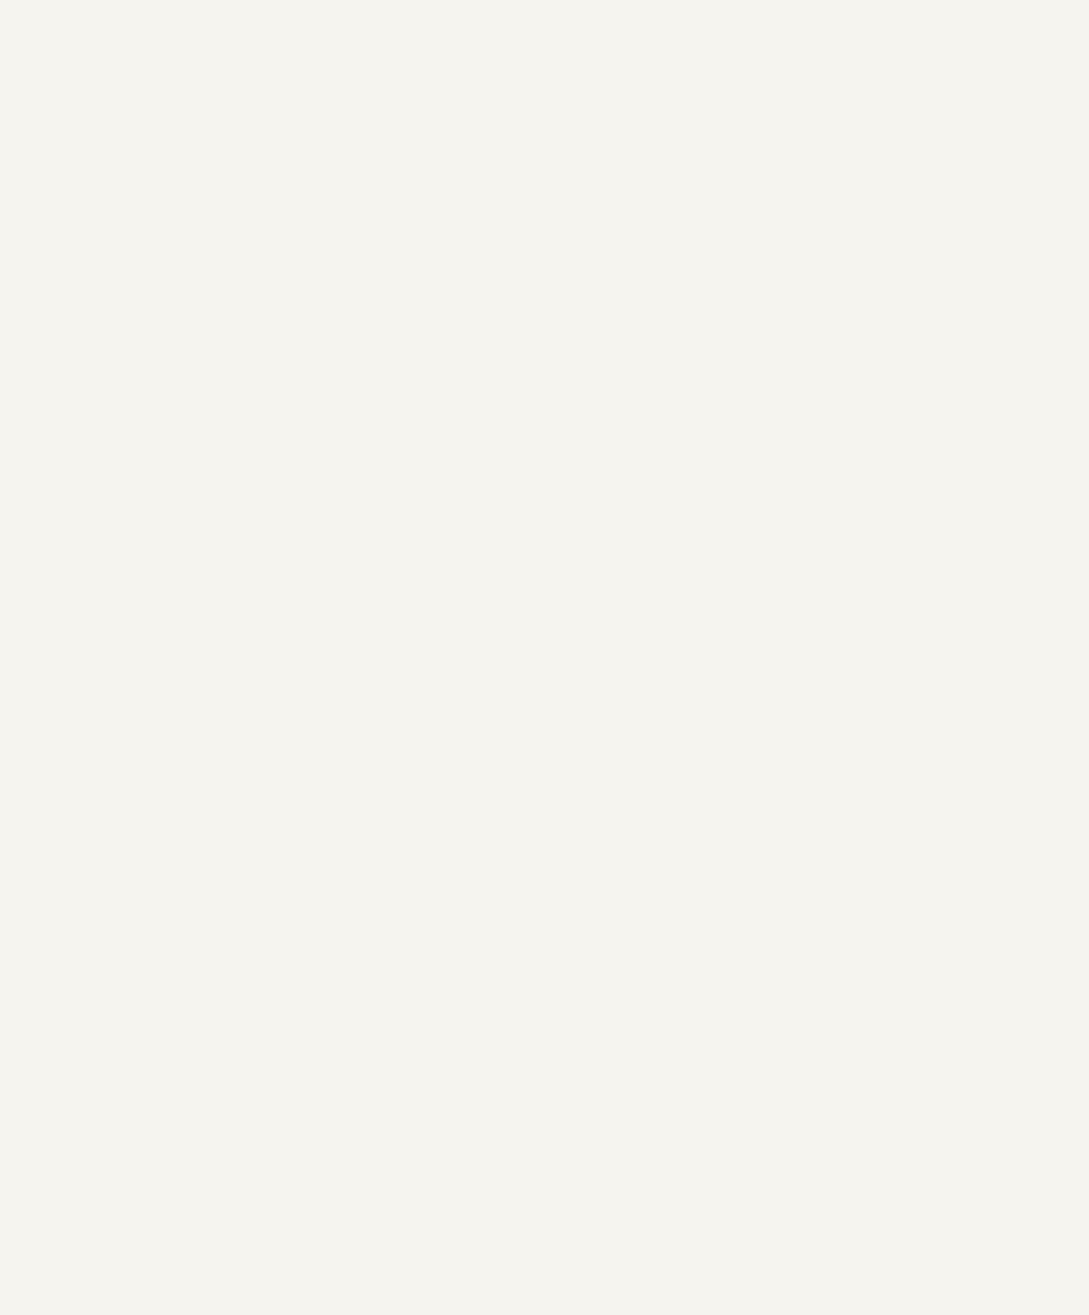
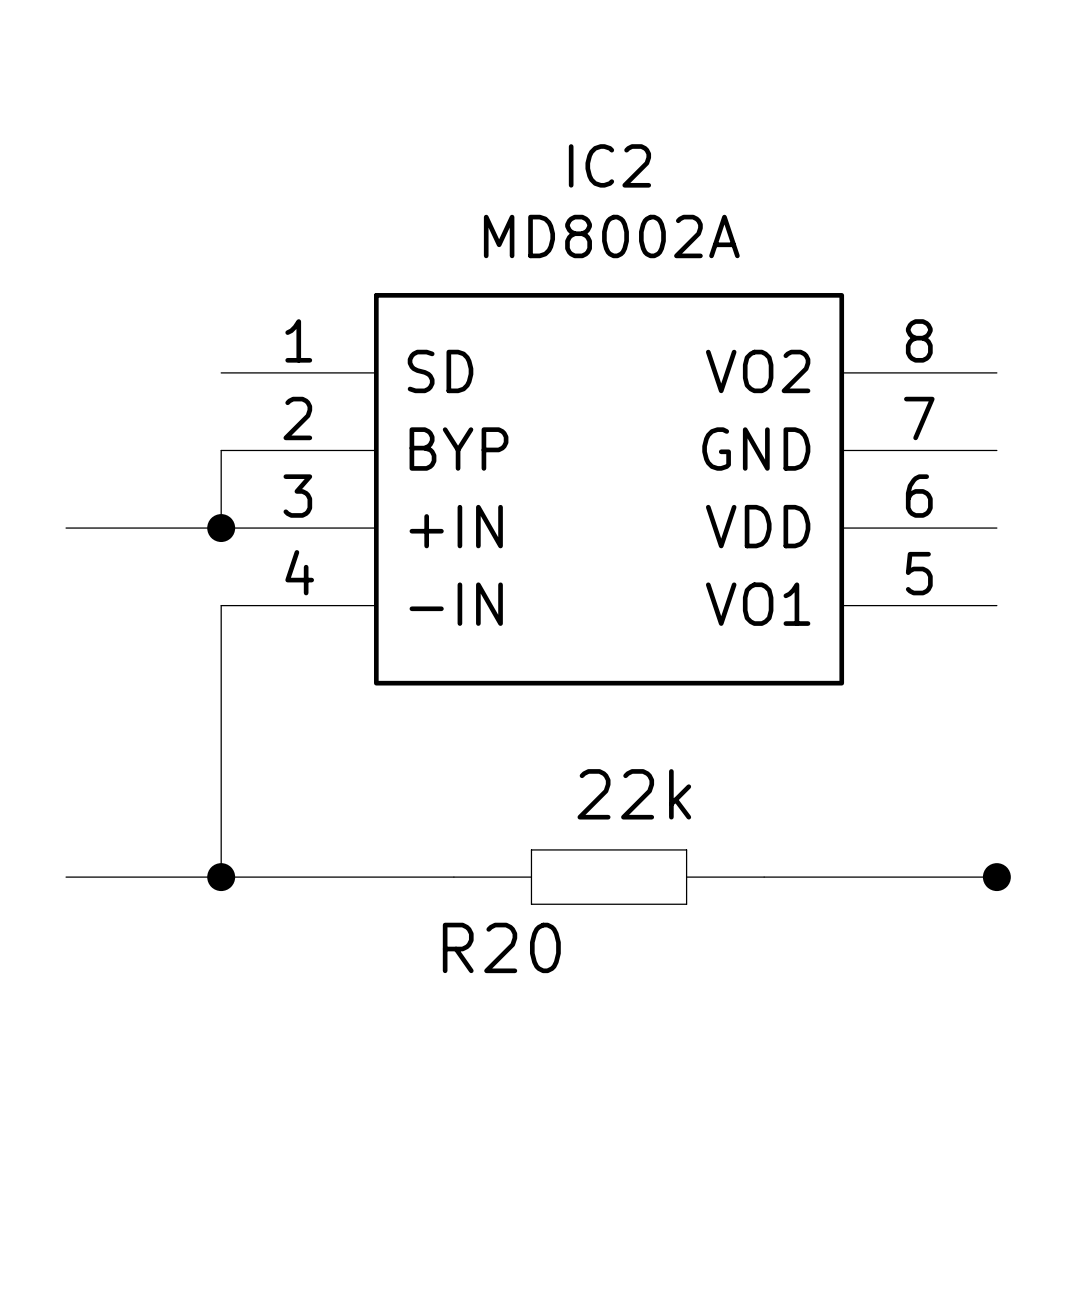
wire: none -> (221, 450) (221, 528) (66, 528)
IC2: none -> MD8002A (609, 489)
junction: none -> (221, 528)
wire: none -> (221, 605) (221, 877)
wire: none -> (66, 877) (453, 877)
junction: none -> (221, 877)
R20: none -> 22k (609, 877)
wire: none -> (764, 877) (996, 877)
junction: none -> (996, 877)

